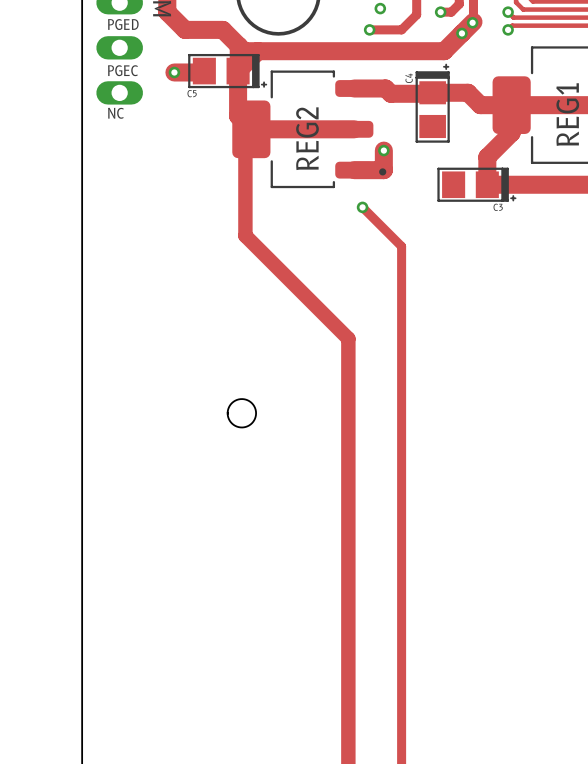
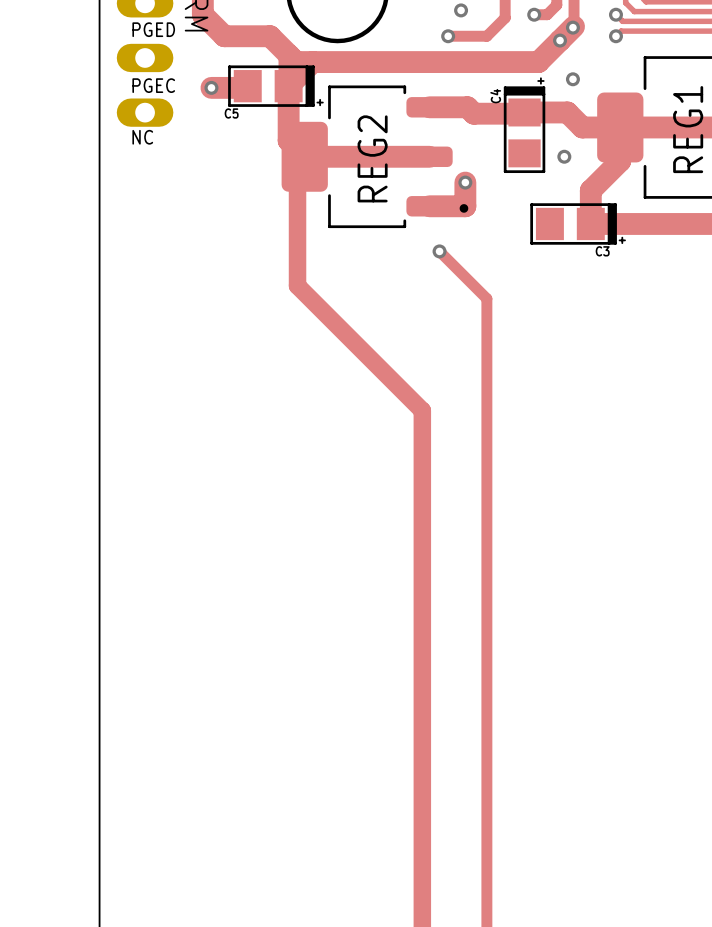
via: none -> (572, 79)
via: none -> (564, 156)
board edge: (227, 412) (232, 423) (242, 427) (252, 423) (256, 413) (252, 403) (242, 399) (232, 402) (227, 412) -> none

